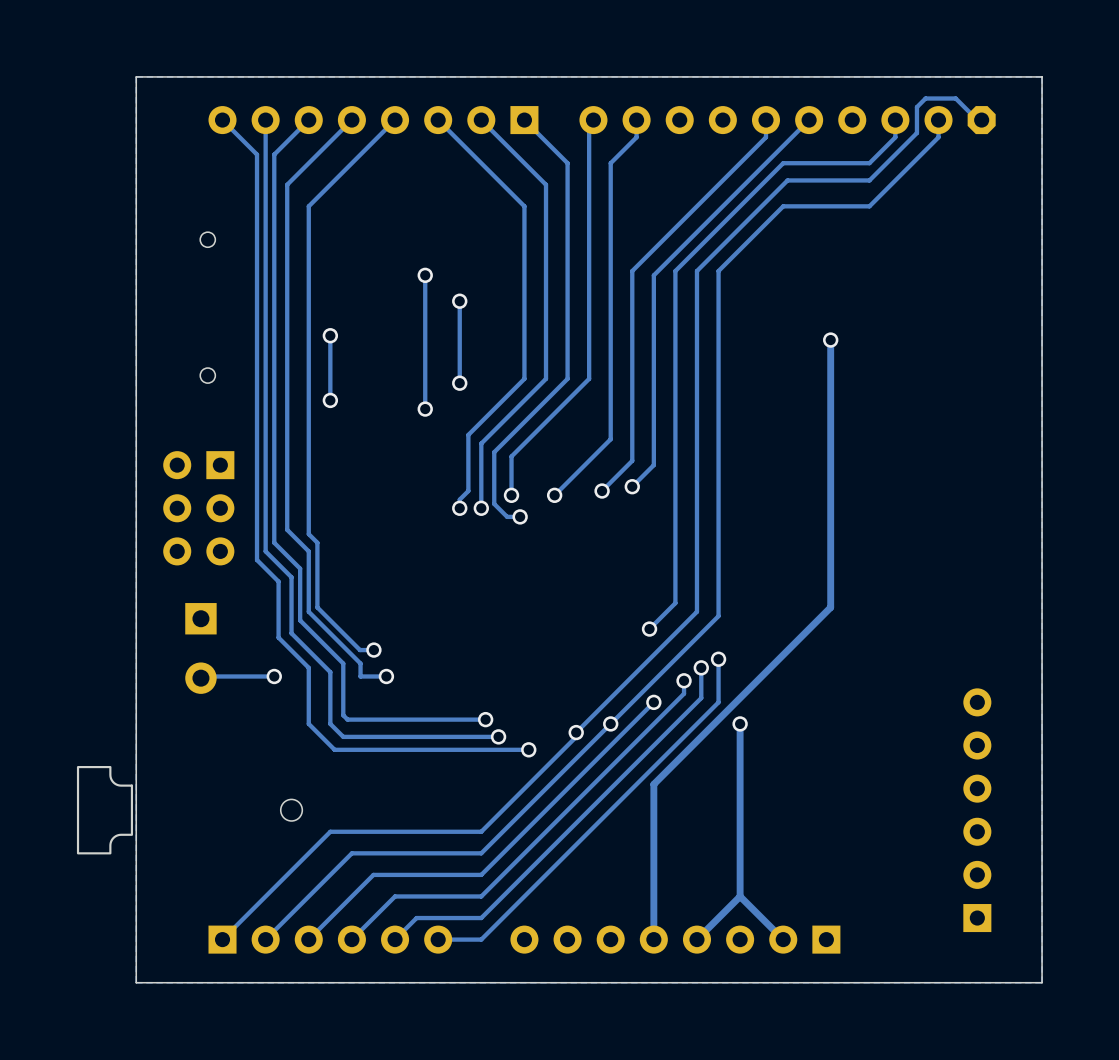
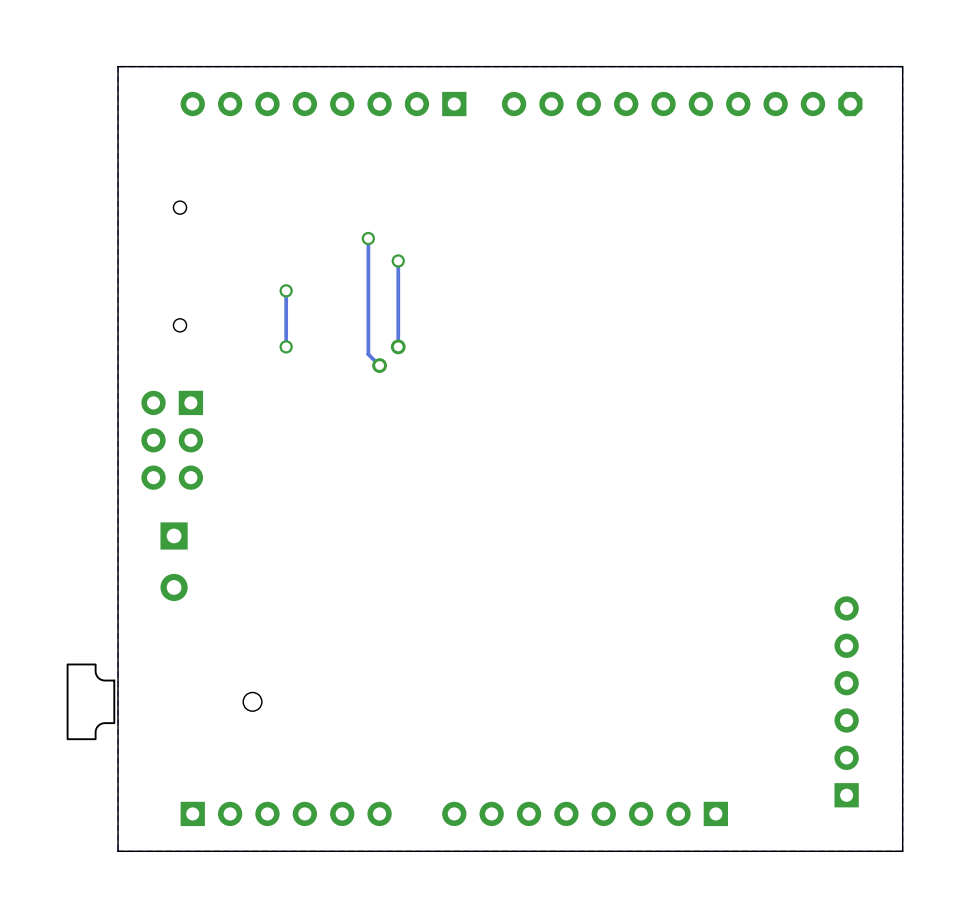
track: (222, 120) (257, 154) (257, 560) (278, 581) (278, 637) (308, 667) (308, 723) (334, 749) (528, 749) -> none
track: (265, 120) (265, 551) (291, 577) (291, 633) (330, 672) (330, 723) (343, 736) (498, 736) -> none
track: (308, 120) (274, 154) (274, 542) (300, 568) (300, 620) (343, 663) (343, 715) (347, 719) (485, 719) -> none
track: (351, 120) (287, 184) (287, 529) (308, 551) (308, 611) (360, 663) (360, 676) (386, 676) -> none
track: (395, 120) (308, 206) (308, 534) (317, 542) (317, 607) (360, 650) (373, 650) -> none
track: (438, 120) (524, 206) (524, 378) (468, 434) (468, 491) (459, 499) (459, 508) -> none
track: (481, 120) (546, 184) (546, 378) (481, 443) (481, 508) -> none
track: (524, 120) (567, 163) (567, 378) (494, 452) (494, 503) (507, 516) (520, 516) -> none
track: (593, 120) (589, 124) (589, 378) (511, 456) (511, 495) -> none
track: (636, 120) (636, 137) (610, 163) (610, 439) (554, 495) -> none
track: (765, 120) (765, 137) (632, 271) (632, 460) (602, 491) -> none
track: (809, 120) (653, 275) (653, 465) (632, 486) -> none
track: (895, 120) (895, 137) (869, 163) (783, 163) (675, 271) (675, 603) (649, 629) -> none
track: (938, 120) (938, 137) (869, 206) (783, 206) (718, 271) (718, 616) (481, 853) (351, 853) (265, 939) -> none
track: (981, 120) (977, 120) (955, 98) (925, 98) (916, 107) (916, 133) (869, 180) (787, 180) (696, 271) (696, 611) (576, 732) (576, 736) (481, 831) (330, 831) (222, 939) -> none
track: (830, 340) (830, 607) (653, 784) (653, 939) -> none
via: (830, 340) -> none
track: none -> (398, 331) (398, 346)
via: (459, 383) -> none
via: none -> (398, 346)
track: none -> (368, 354) (379, 365)
via: (425, 409) -> none
via: none -> (379, 365)
via: (632, 486) -> none
via: (602, 491) -> none
via: (511, 495) -> none
via: (554, 495) -> none
via: (459, 508) -> none
via: (481, 508) -> none
via: (520, 516) -> none
via: (649, 629) -> none
via: (373, 650) -> none
track: (718, 659) (718, 702) (481, 939) (438, 939) -> none
via: (718, 659) -> none
track: (701, 667) (701, 698) (481, 918) (416, 918) (395, 939) -> none
via: (701, 667) -> none
track: (274, 676) (200, 676) (200, 678) -> none
via: (274, 676) -> none
via: (386, 676) -> none
track: (684, 680) (684, 693) (481, 896) (395, 896) (351, 939) -> none
via: (684, 680) -> none
track: (653, 702) (481, 874) (373, 874) (308, 939) -> none
via: (653, 702) -> none
via: (485, 719) -> none
via: (610, 723) -> none
track: (740, 723) (740, 896) -> none
via: (740, 723) -> none
via: (576, 732) -> none
via: (498, 736) -> none
via: (528, 749) -> none
track: (740, 896) (783, 939) -> none
track: (740, 896) (696, 939) -> none

